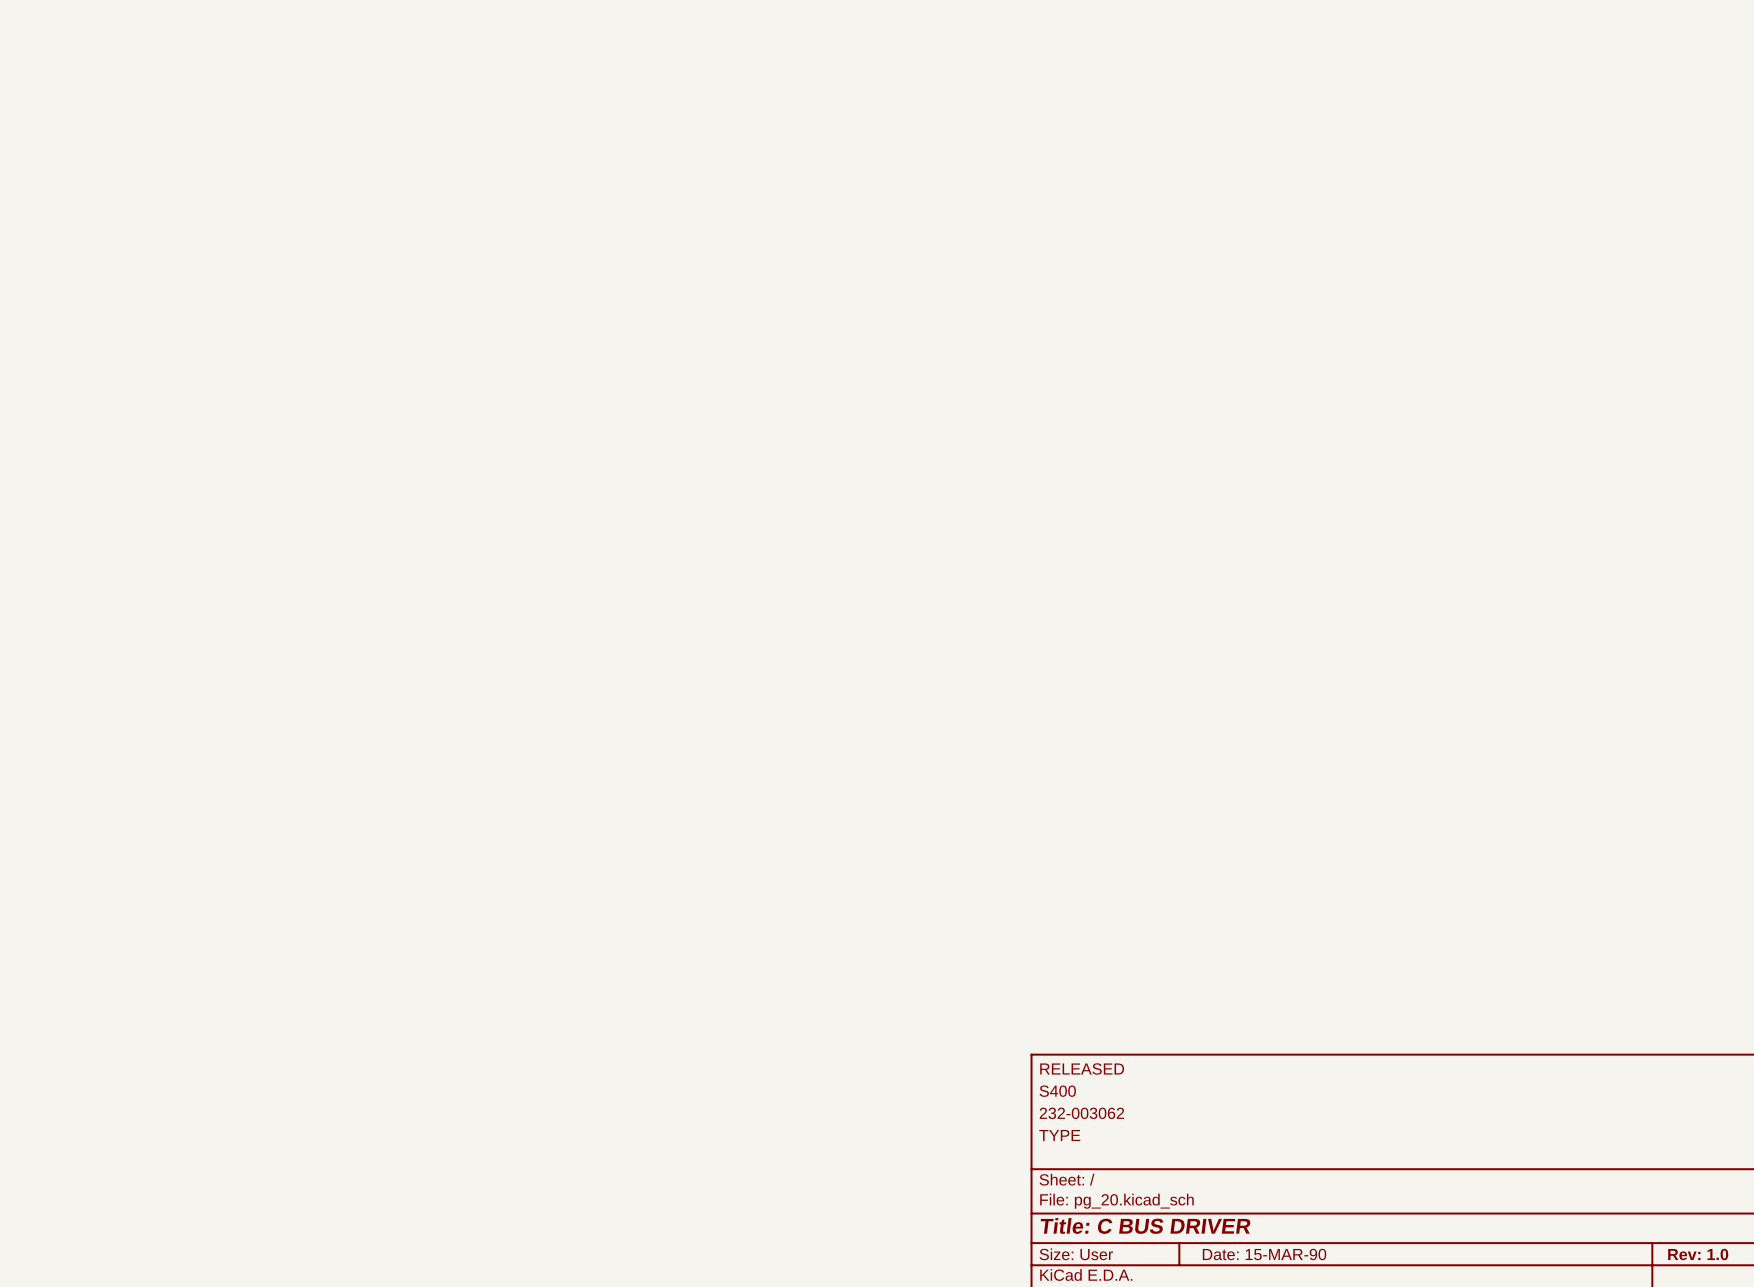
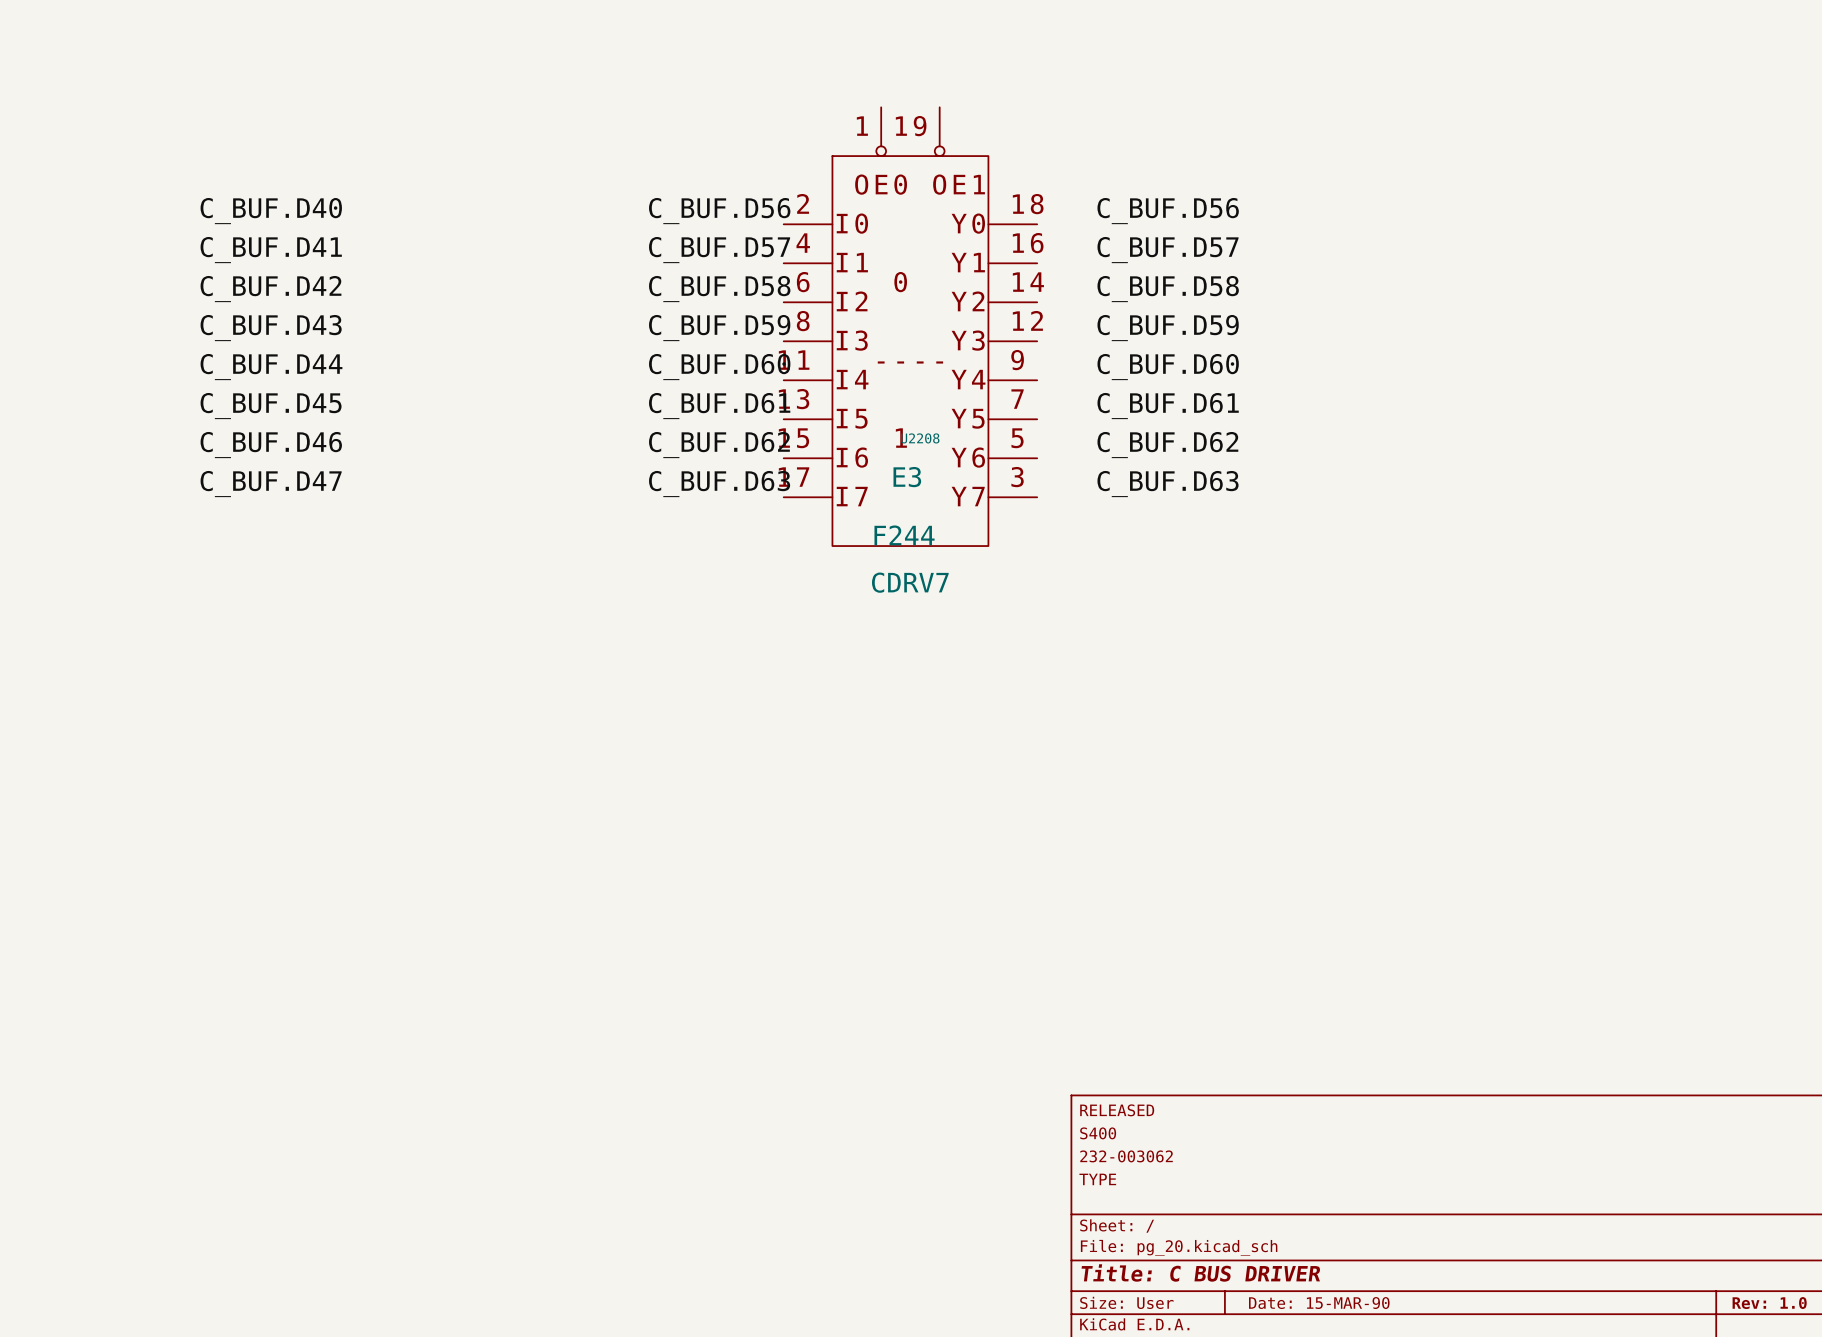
label: none -> C_BUF.D40 (271, 211)
label: none -> C_BUF.D56 (719, 211)
label: none -> C_BUF.D56 (1168, 211)
label: none -> C_BUF.D41 (271, 250)
label: none -> C_BUF.D57 (719, 250)
label: none -> C_BUF.D57 (1168, 250)
label: none -> C_BUF.D42 (270, 289)
label: none -> C_BUF.D58 (719, 289)
label: none -> C_BUF.D58 (1168, 289)
U2208: none -> F244 (910, 326)
label: none -> C_BUF.D43 (271, 328)
label: none -> C_BUF.D59 (719, 328)
label: none -> C_BUF.D59 (1168, 328)
label: none -> C_BUF.D44 (271, 367)
label: none -> C_BUF.D60 (719, 367)
label: none -> C_BUF.D60 (1168, 367)
label: none -> C_BUF.D45 (271, 406)
label: none -> C_BUF.D61 (719, 406)
label: none -> C_BUF.D61 (1168, 406)
label: none -> C_BUF.D46 (271, 445)
label: none -> C_BUF.D62 (719, 445)
label: none -> C_BUF.D62 (1167, 445)
label: none -> C_BUF.D47 (271, 484)
label: none -> C_BUF.D63 (719, 484)
label: none -> C_BUF.D63 (1168, 484)

